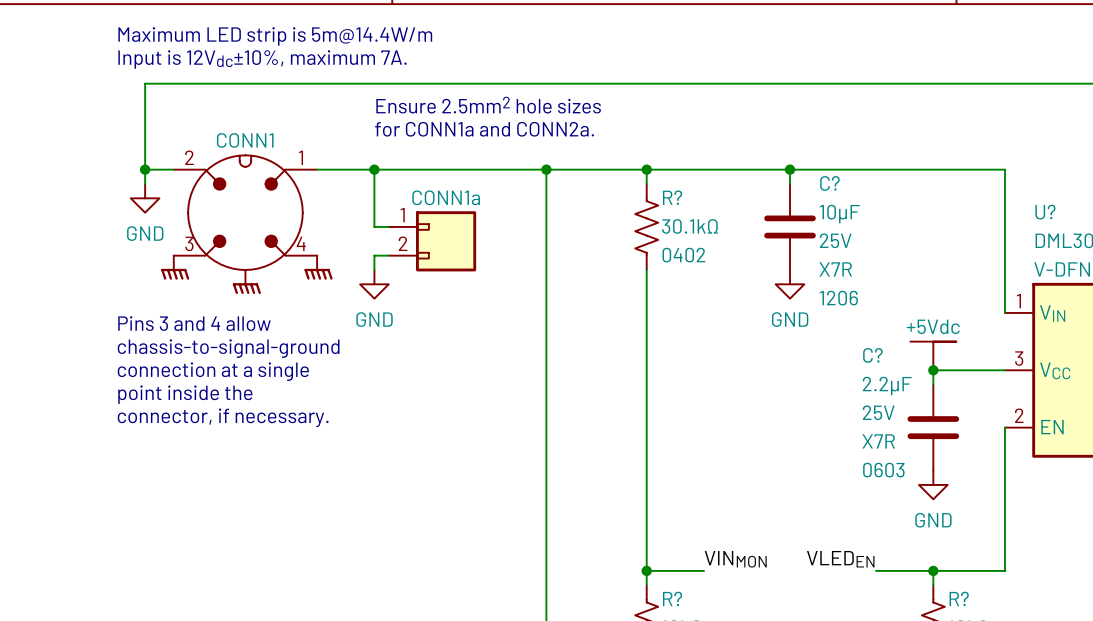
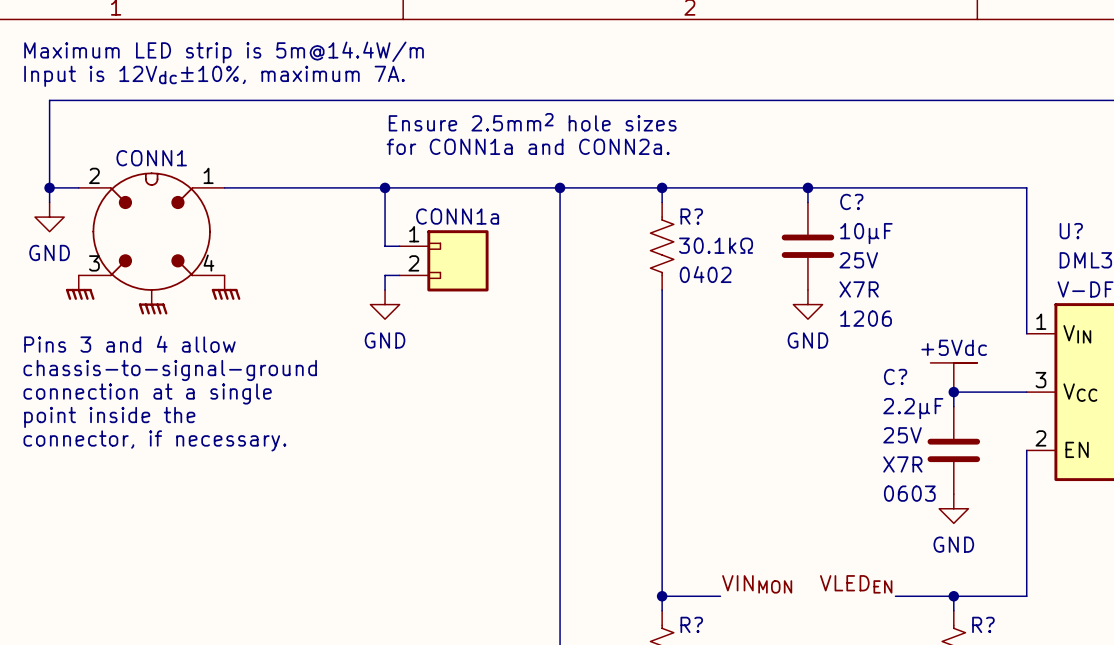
text position: Maximum LED strip is 5m@14.4W/m (275, 36) -> Maximum LED strip is 5m@14.4W/m (224, 52)
text position: Input is 12Vdc±10%, maximum 7A. (262, 59) -> Input is 12Vdc±10%, maximum 7A. (214, 76)
wire: (145, 83) (145, 183) -> (151, 100) (49, 100) (49, 202)
junction: none -> (49, 187)
wire: (145, 169) (173, 169) -> (49, 187) (78, 187)
junction: (145, 169) -> none
wire: none -> (224, 187) (326, 187)
power symbol position: GND (145, 198) -> GND (49, 217)
CONN1 position: (245, 224) -> (151, 243)
power symbol: none -> (80, 287)
power symbol position: (175, 267) -> (226, 287)
power symbol: (318, 267) -> none
text position: Pins 3 and 4 allow (194, 323) -> Pins 3 and 4 allow (129, 344)
text position: chassis-to-signal-ground (228, 348) -> chassis-to-signal-ground (170, 370)
text position: connection at a single (213, 371) -> connection at a single (147, 393)
text position: point inside the (185, 394) -> point inside the (109, 417)
text position: connector, if necessary. (223, 417) -> connector, if necessary. (154, 440)

